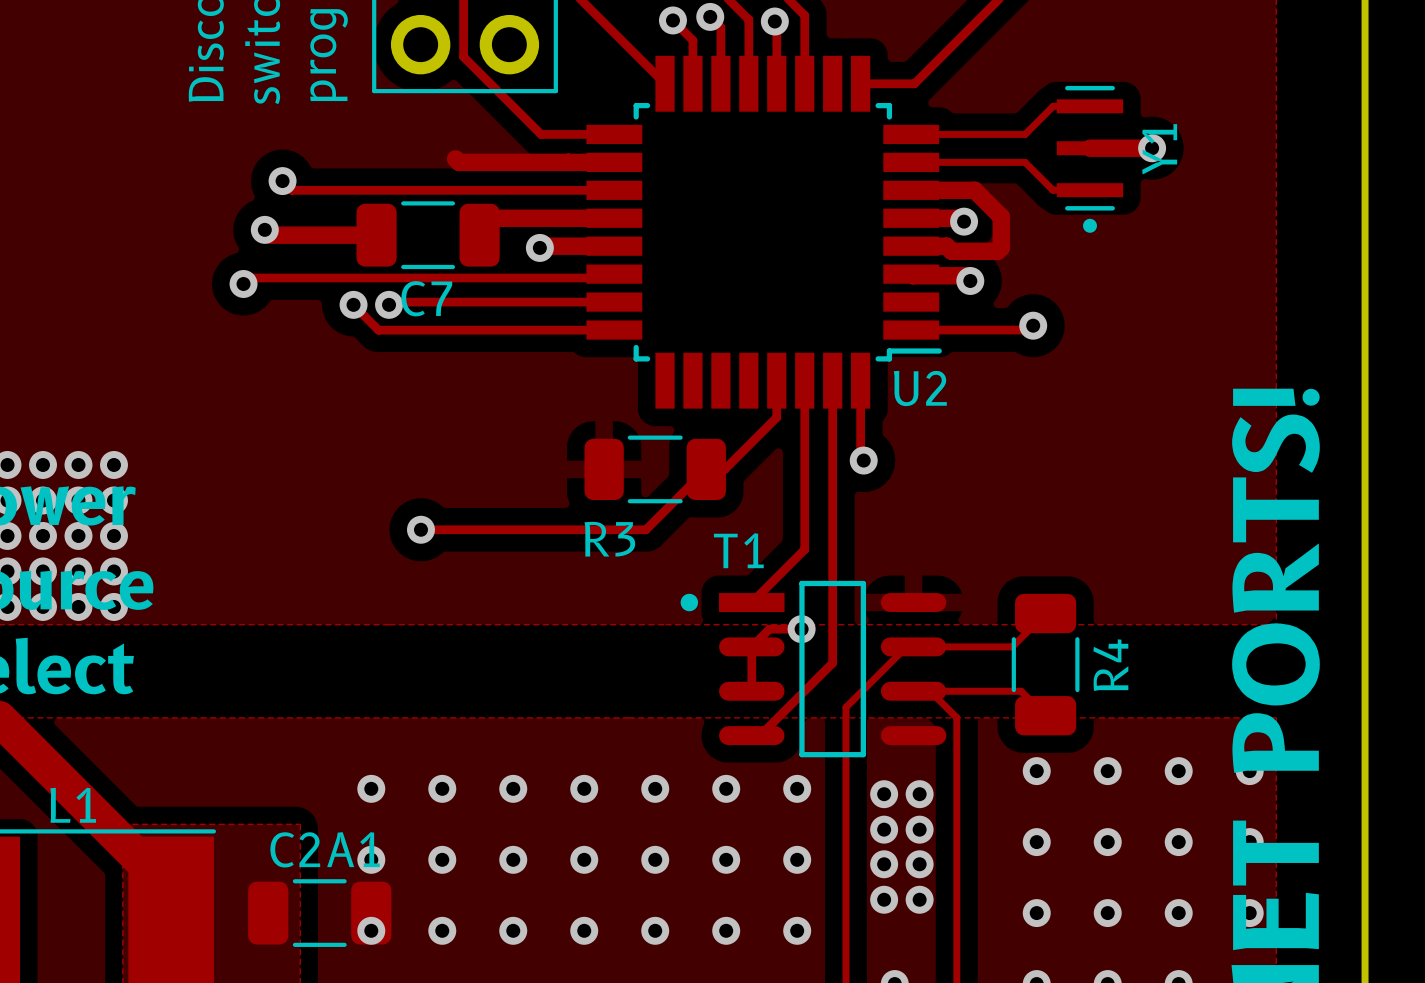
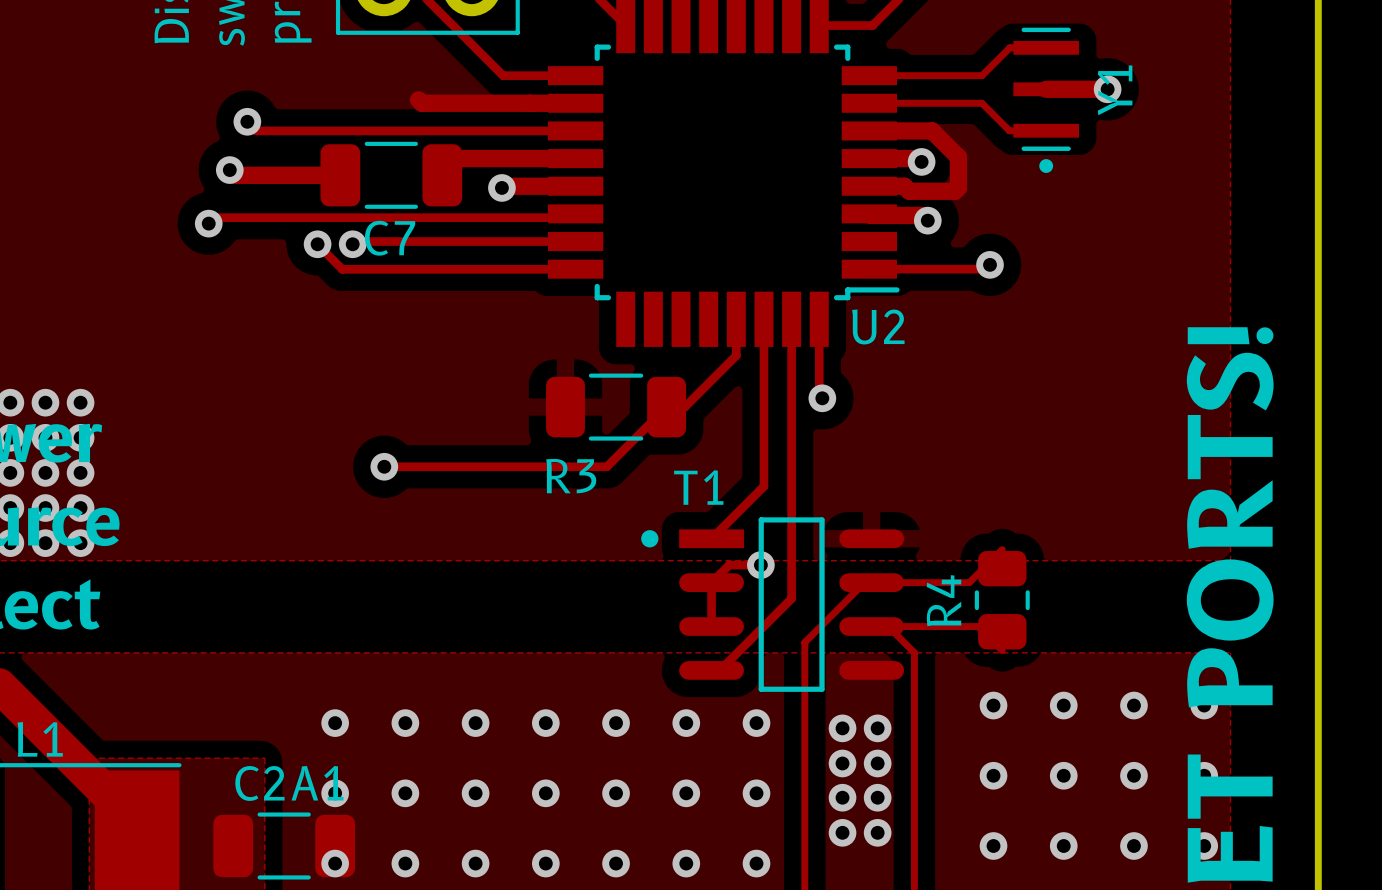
R4 footprint: [1011, 593, 1080, 736] -> [974, 550, 1030, 650]
R4 name position: R4 (1110, 665) -> R4 (943, 600)

